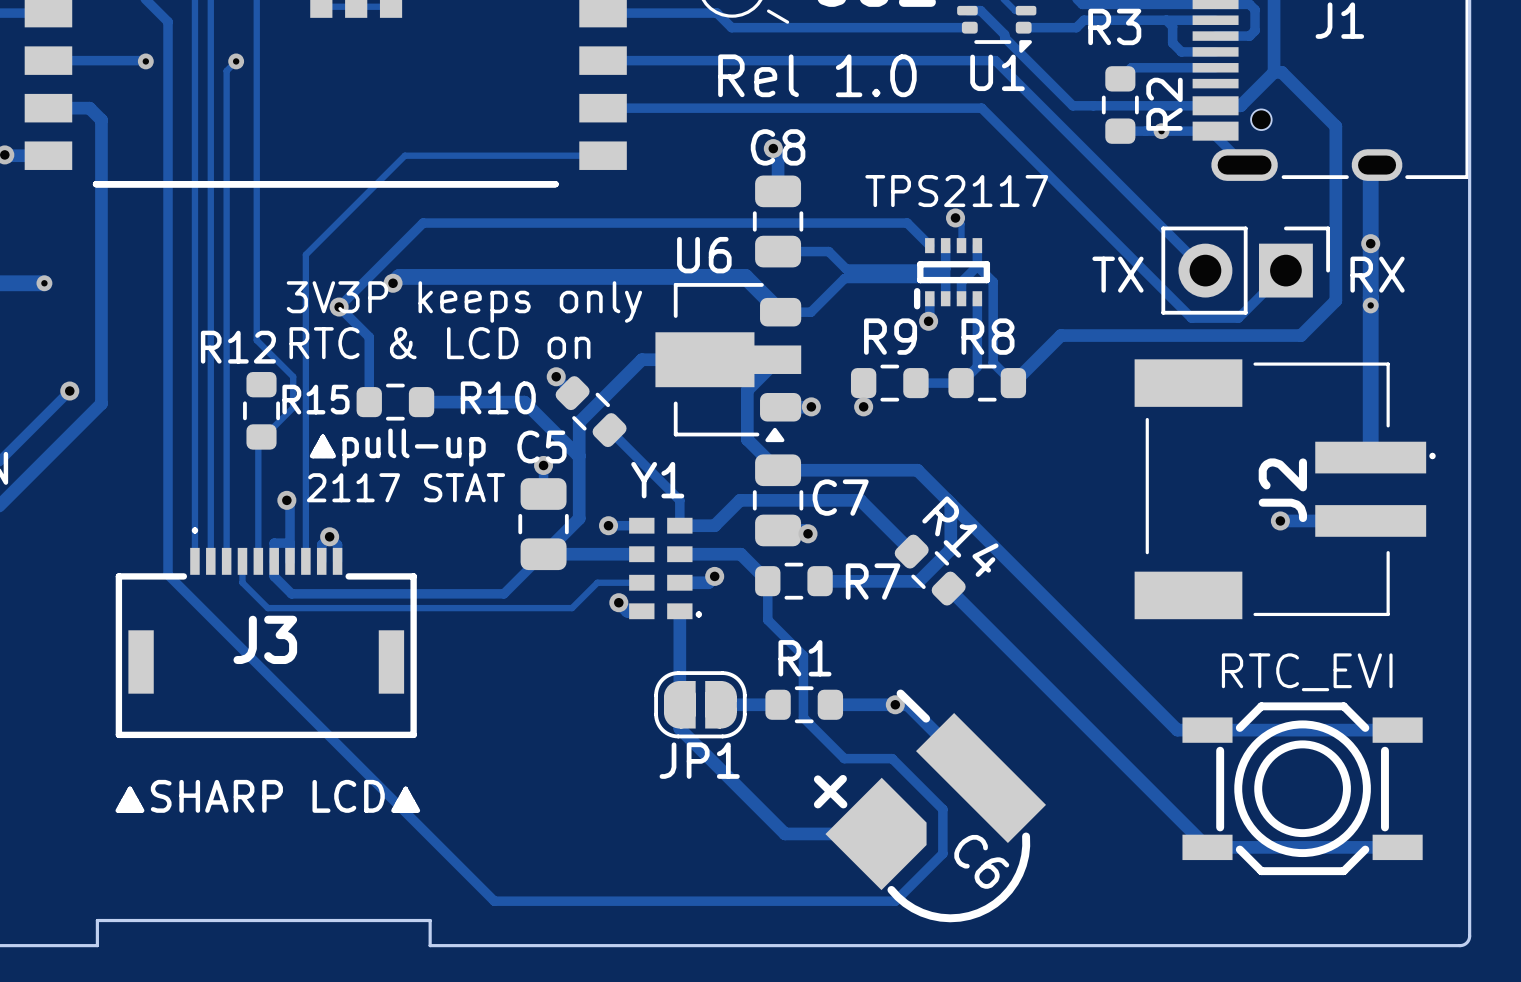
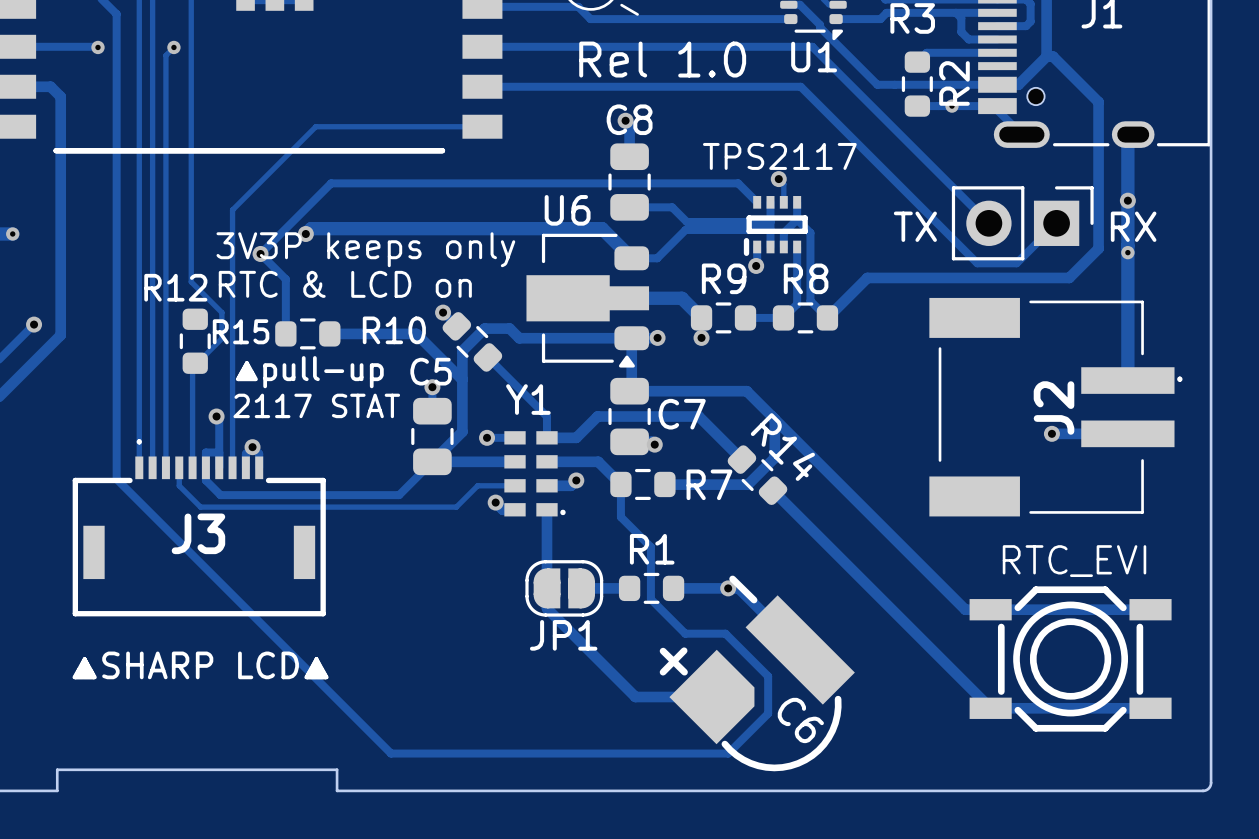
track: none -> (629, 298) (681, 298) (701, 317)
track: (605, 395) (641, 359) (777, 359) (747, 390) (747, 439) (778, 470) -> (484, 328) (509, 328) (519, 338) (631, 338) (631, 389) (629, 391)

